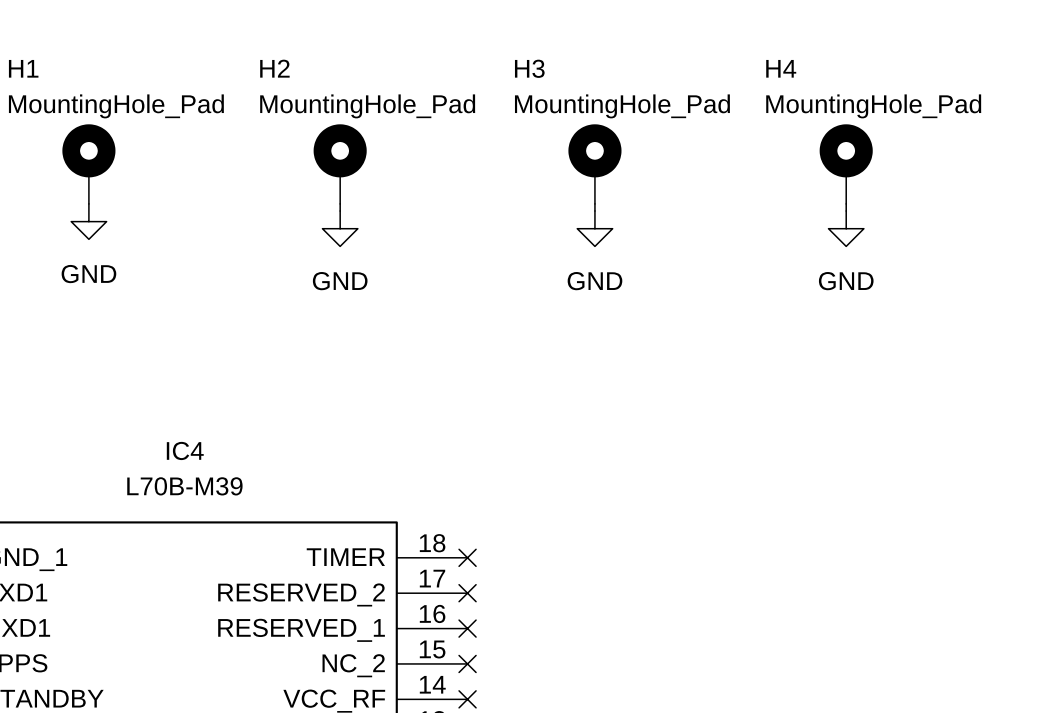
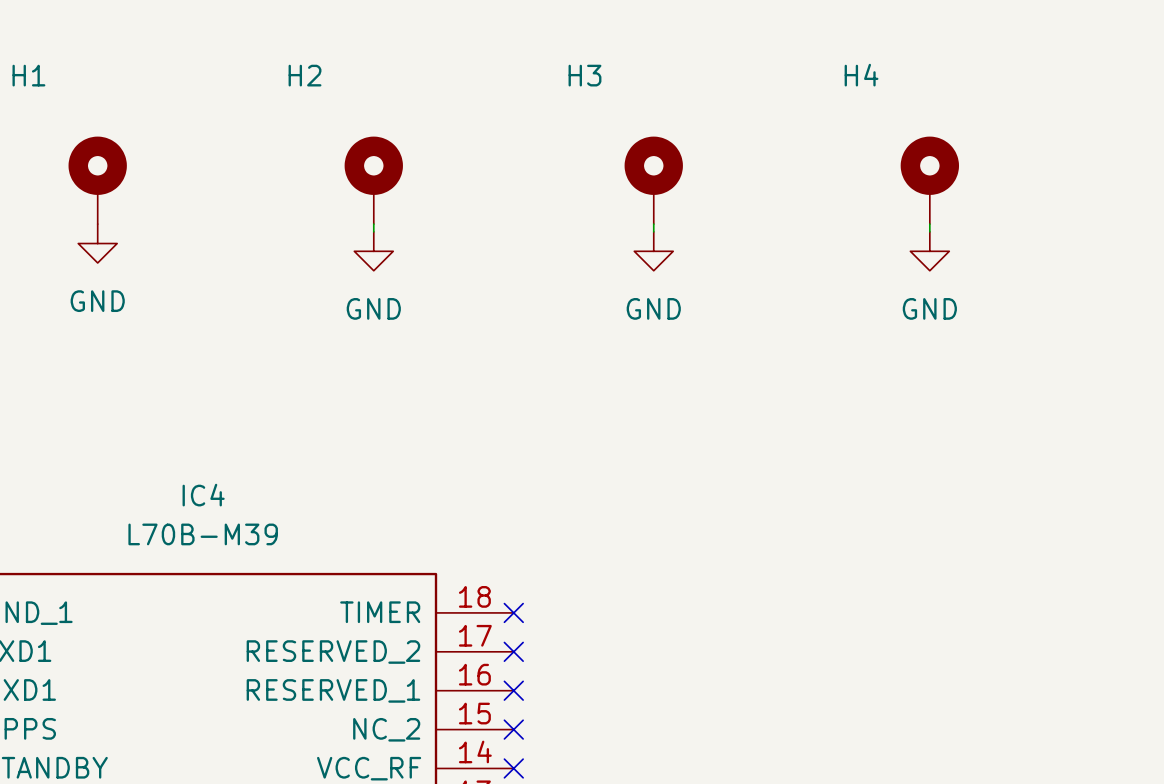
H1 value: MountingHole_Pad (116, 106) -> none
H2 value: MountingHole_Pad (367, 106) -> none
H3 value: MountingHole_Pad (622, 106) -> none
H4 value: MountingHole_Pad (873, 106) -> none

